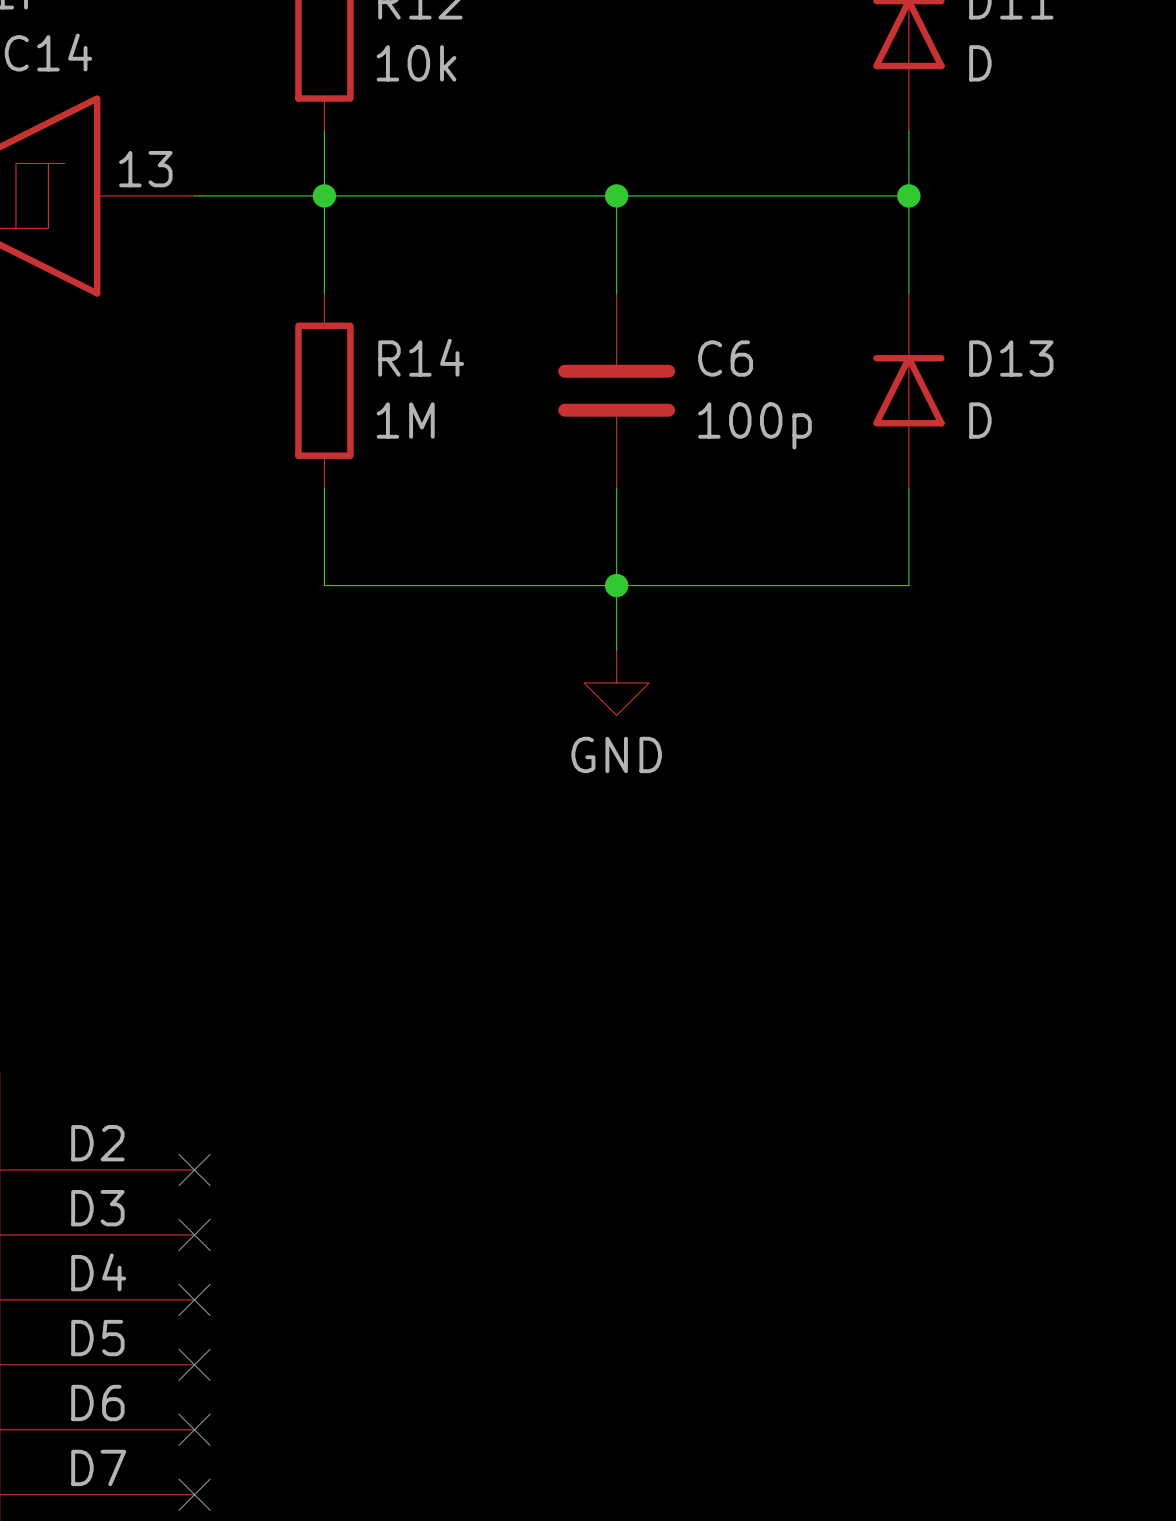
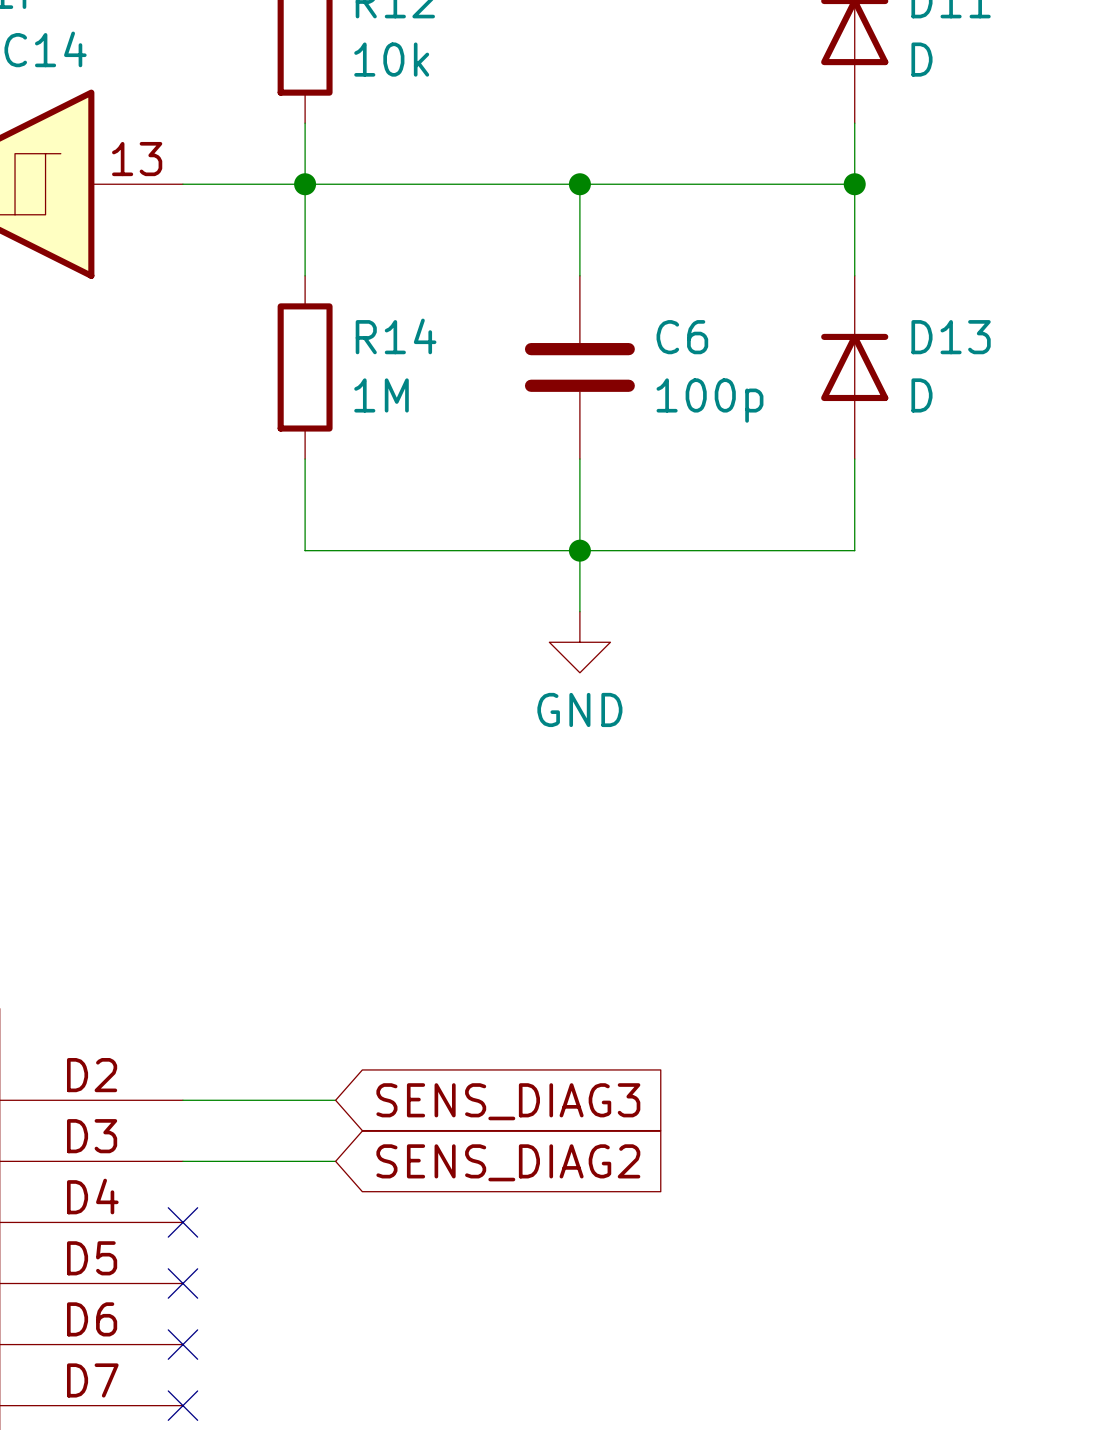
wire: none -> (182, 1100) (335, 1100)
no-connect mark: (194, 1170) -> none
global label: none -> SENS_DIAG3 (508, 1101)
wire: none -> (182, 1161) (335, 1161)
no-connect mark: (194, 1234) -> none
global label: none -> SENS_DIAG2 (508, 1162)

